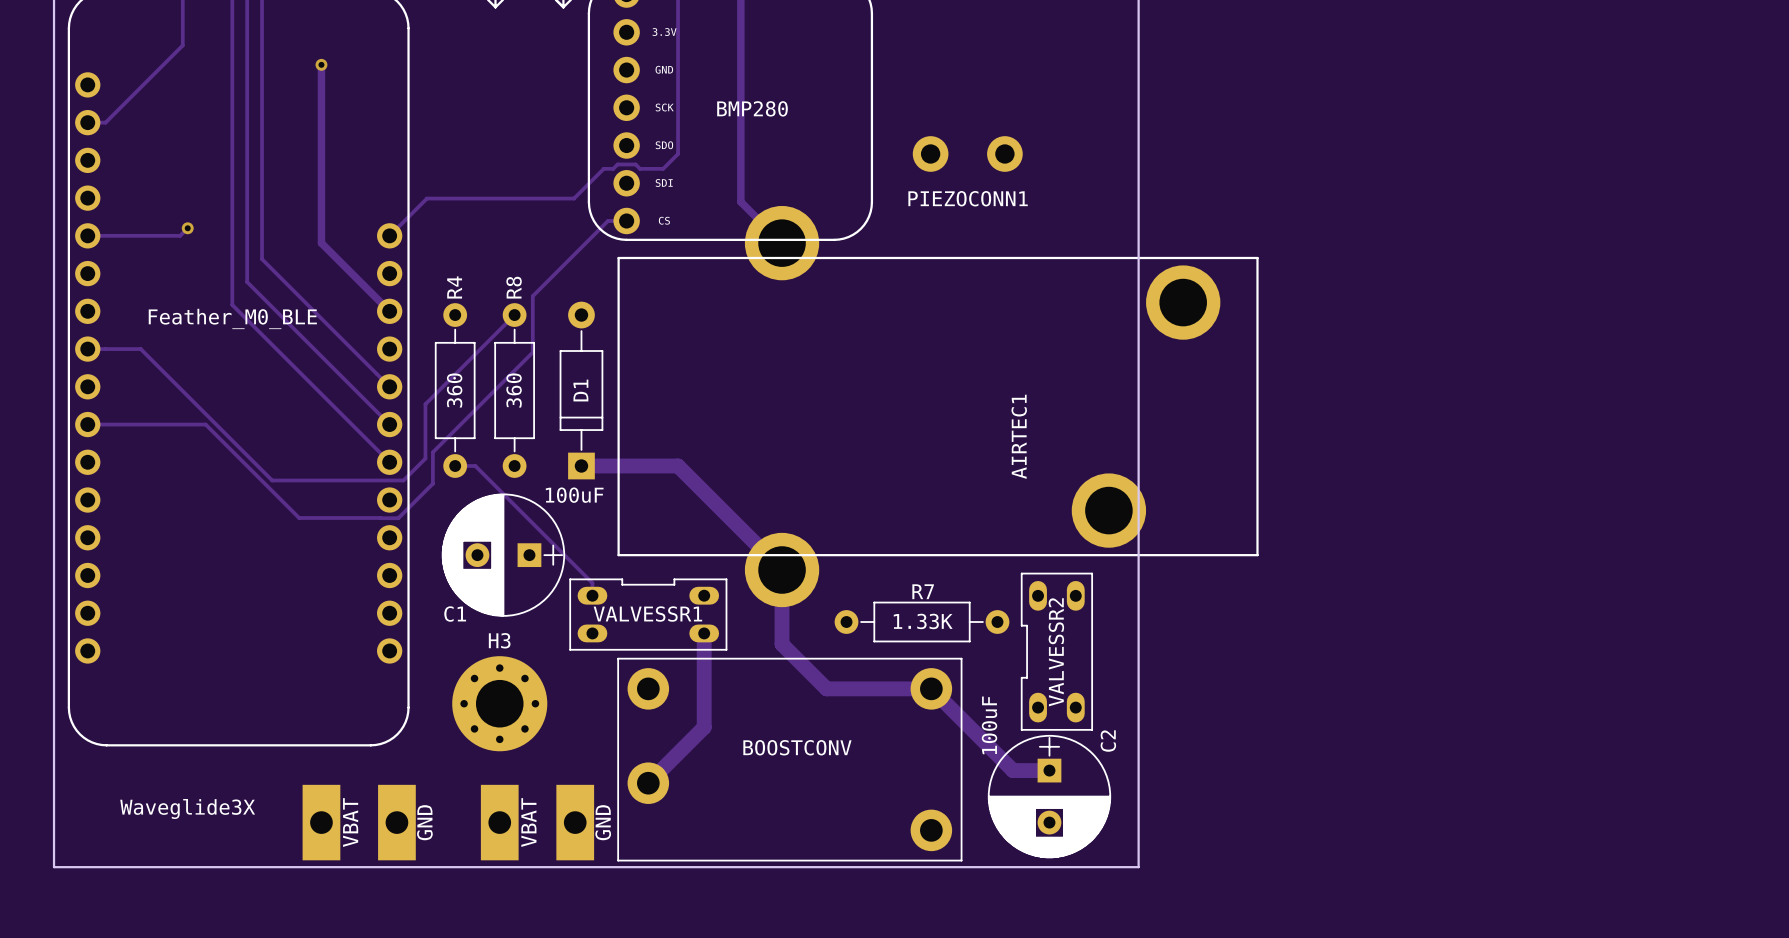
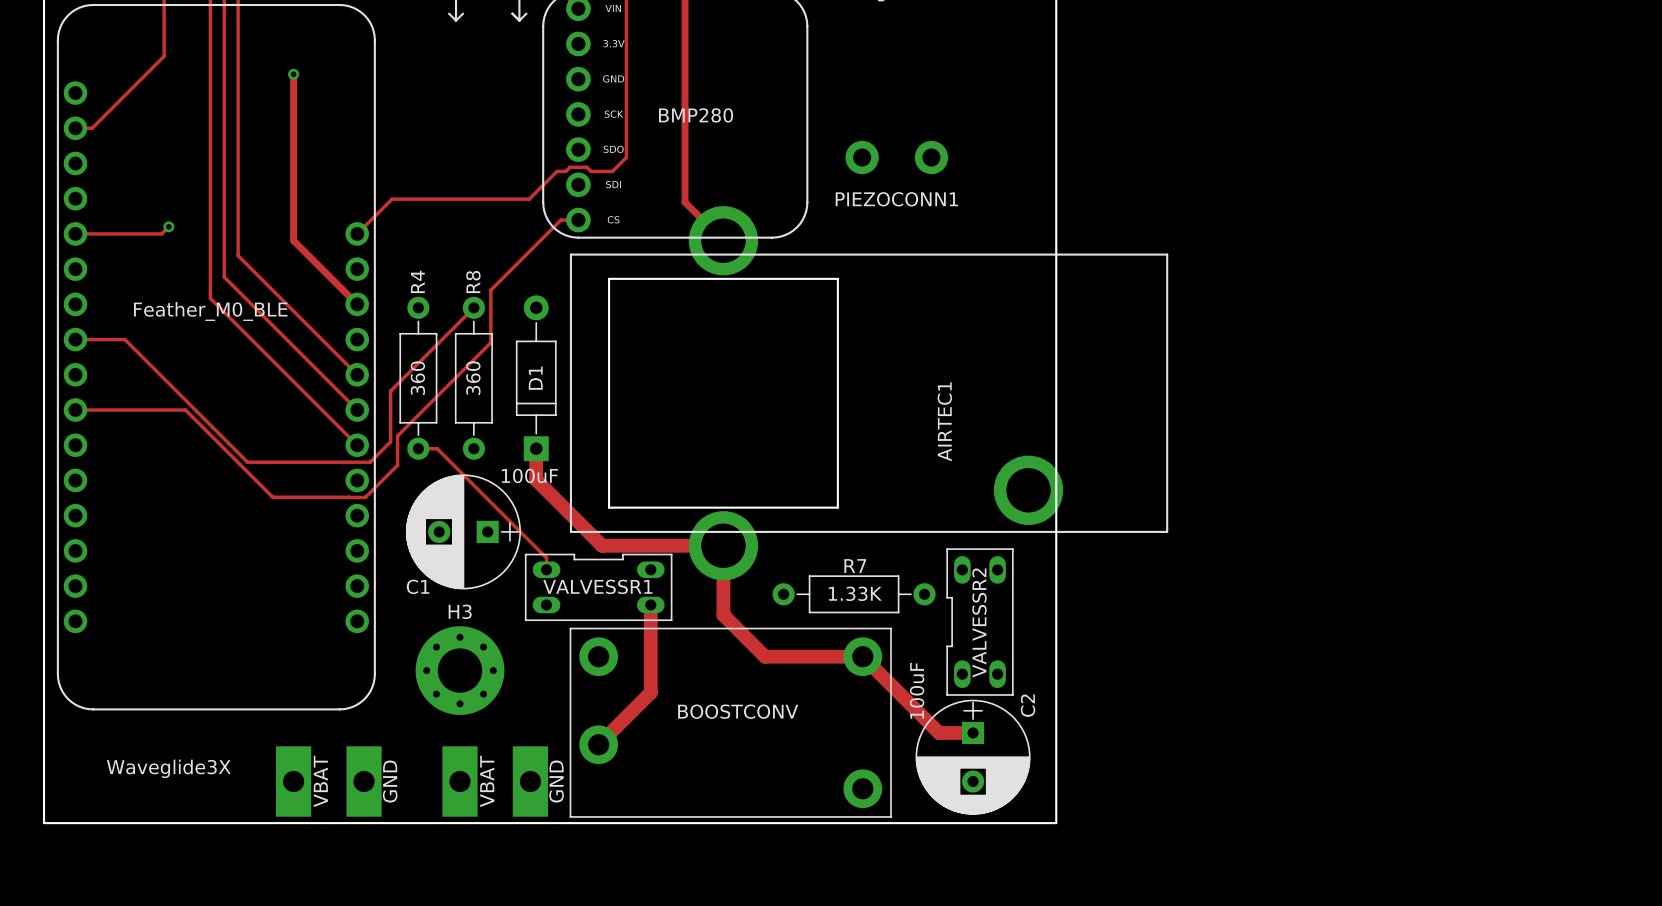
AIRTEC1 footprint: [617, 205, 1259, 608] -> [569, 206, 1169, 581]
board edge: none -> (609, 278) (609, 507) (837, 507) (837, 278) (609, 278)
track: (581, 466) (678, 466) (782, 570) -> (536, 448) (536, 479) (602, 545) (723, 545)

